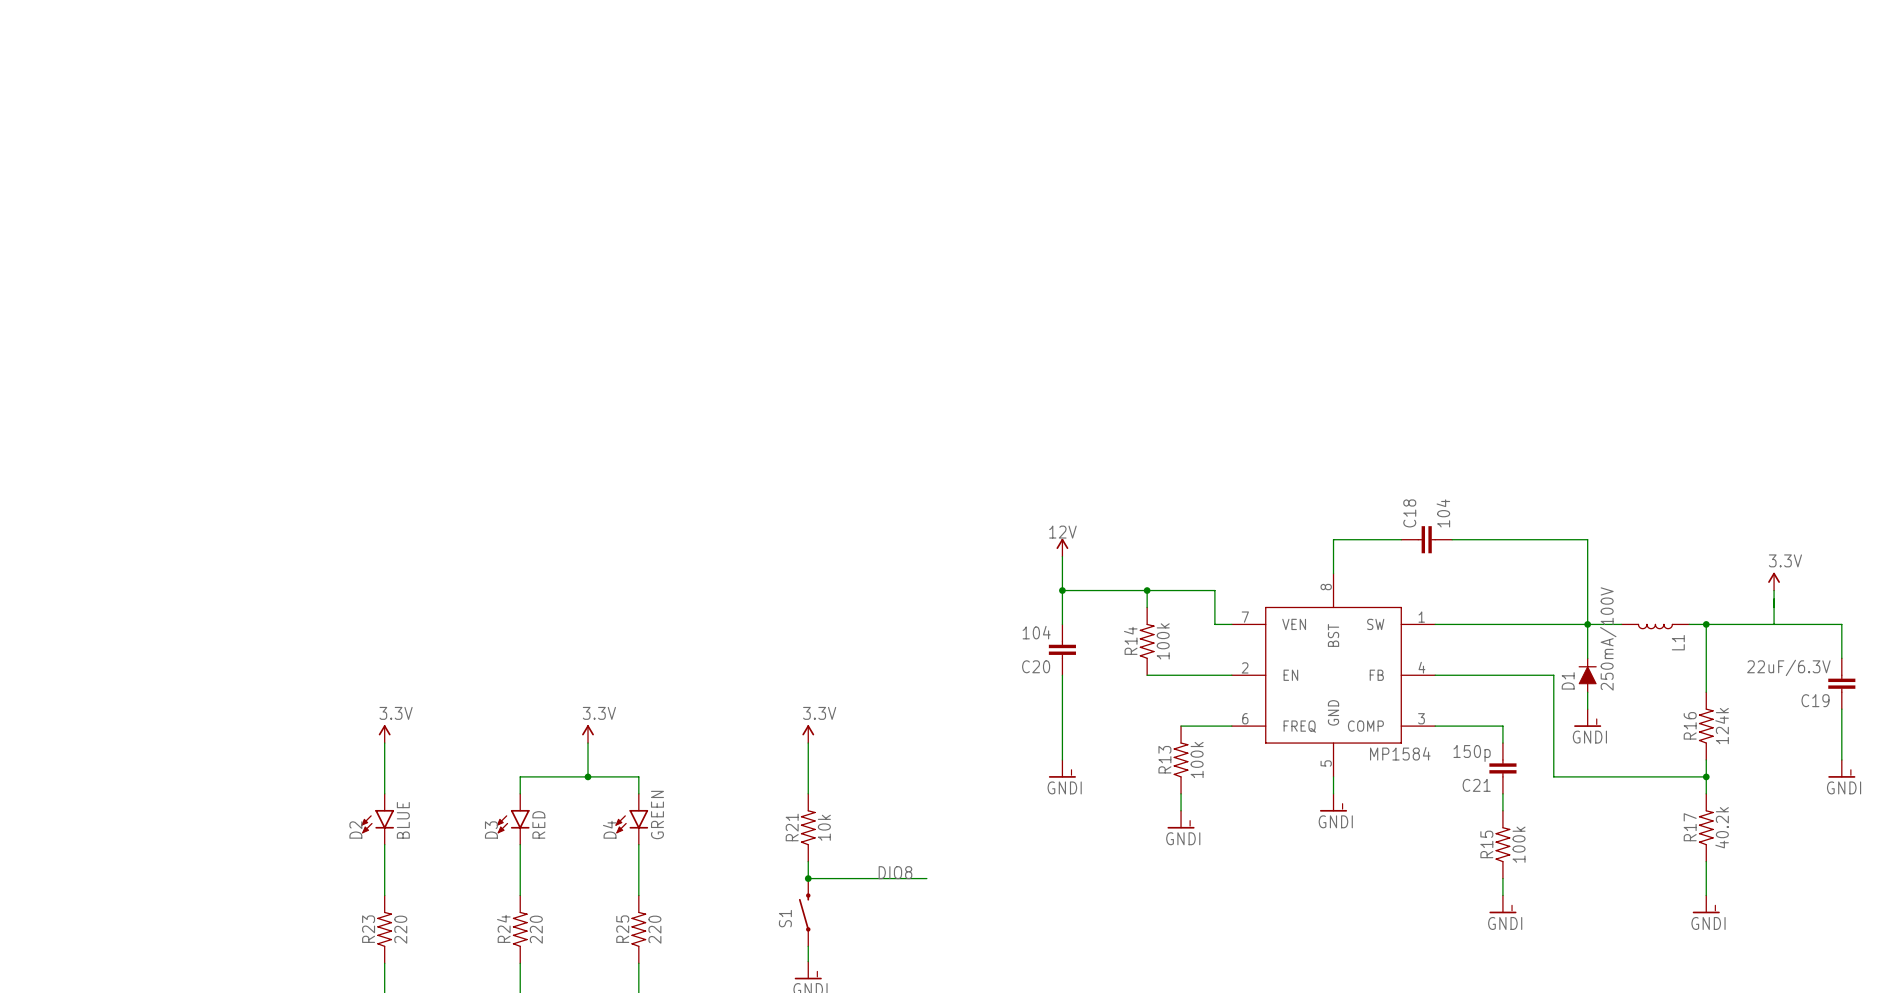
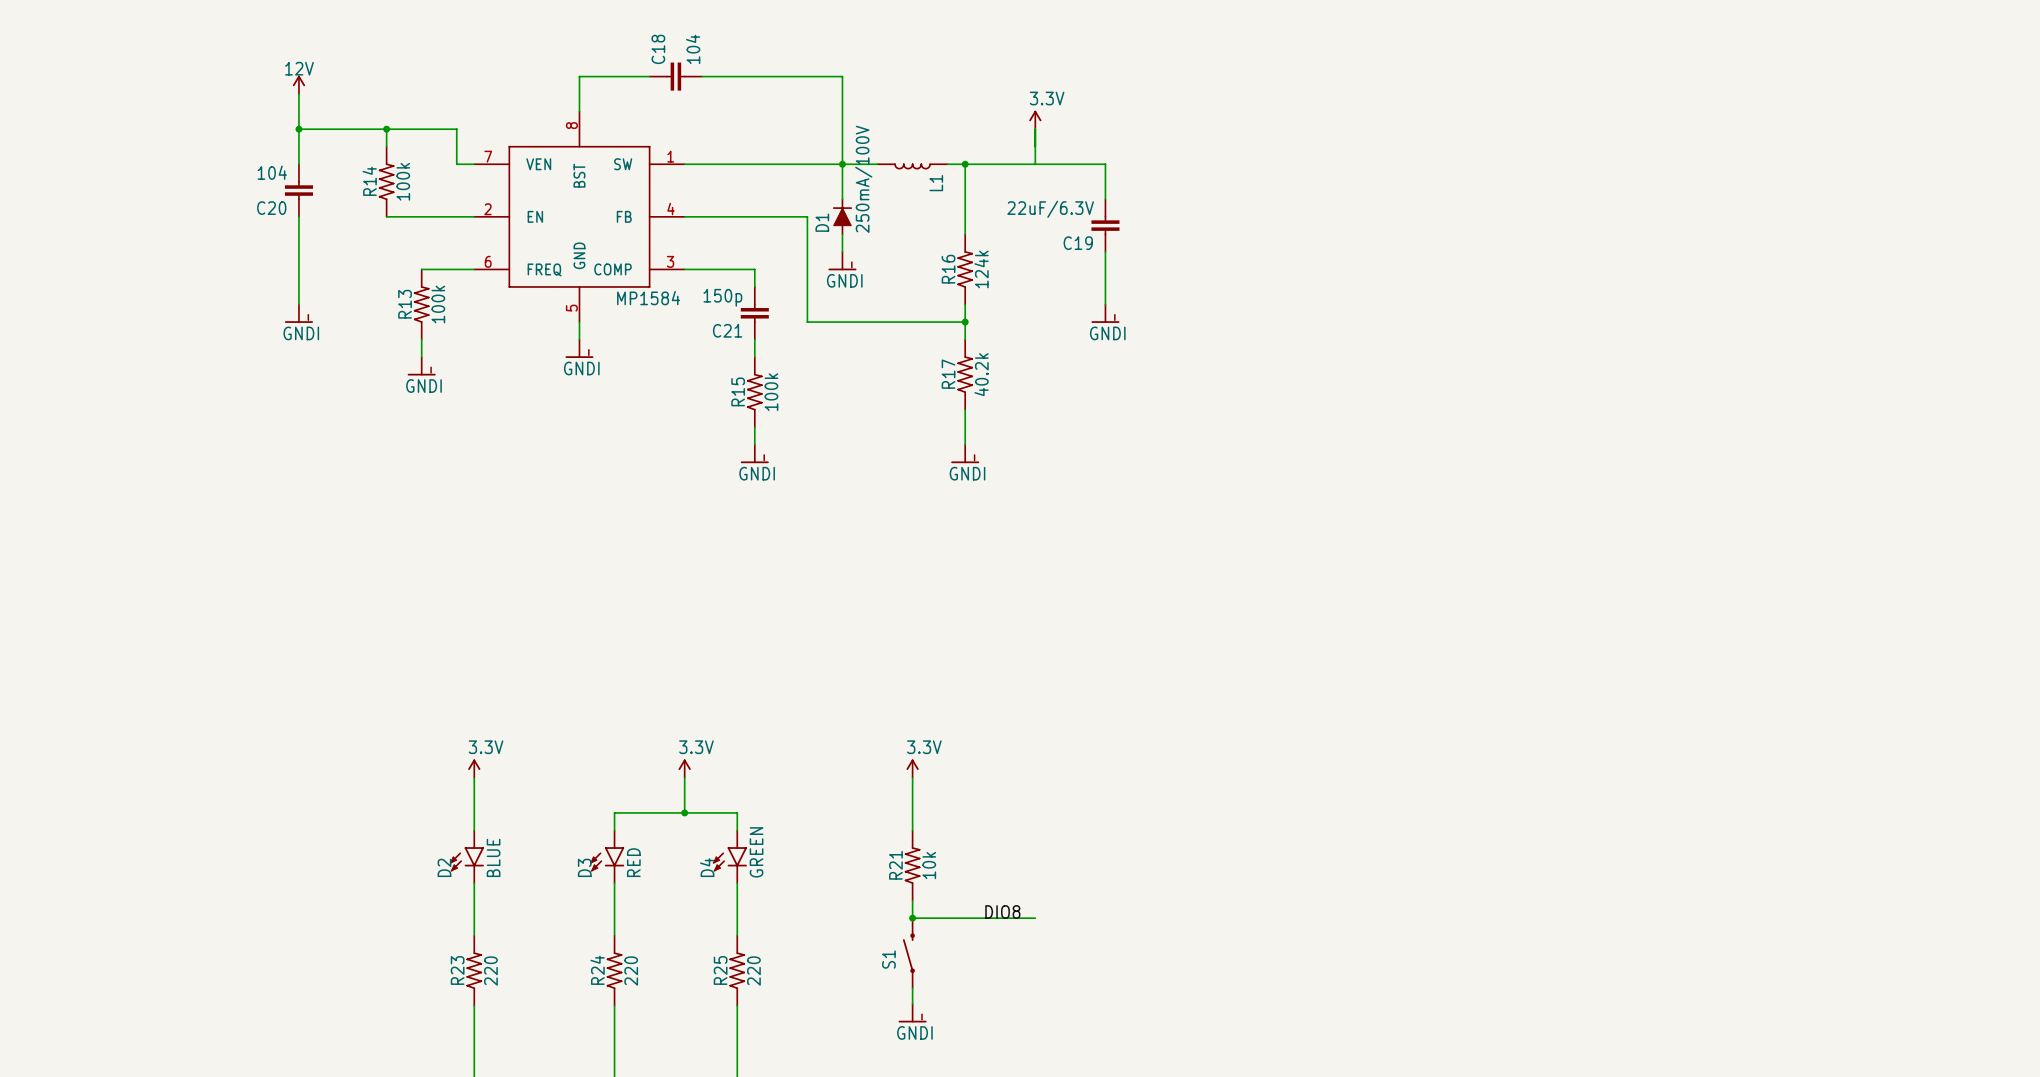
wire: none -> (649, 76) (579, 76) (579, 111)
wire: none -> (702, 76) (842, 76) (842, 199)
power symbol: none -> 12V (298, 84)
wire: none -> (298, 94) (298, 164)
power symbol: none -> 3.3V (1035, 119)
wire: none -> (298, 129) (456, 129) (456, 164) (474, 164)
junction: none -> (298, 129)
wire: none -> (386, 129) (386, 146)
junction: none -> (386, 129)
wire: none -> (1035, 129) (1035, 164)
wire: none -> (684, 164) (877, 164)
junction: none -> (842, 164)
wire: none -> (947, 164) (1105, 164) (1105, 199)
wire: none -> (965, 164) (965, 234)
junction: none -> (965, 164)
wire: none -> (298, 216) (298, 304)
wire: none -> (386, 216) (474, 216)
part: none -> (579, 216)
wire: none -> (684, 216) (807, 216) (807, 322) (965, 322)
wire: none -> (842, 234) (842, 251)
wire: none -> (1105, 251) (1105, 304)
power symbol: none -> GNDI (842, 261)
wire: none -> (421, 269) (474, 269)
wire: none -> (684, 269) (754, 269) (754, 286)
wire: none -> (965, 304) (965, 339)
power symbol: none -> GNDI (298, 313)
power symbol: none -> GNDI (1105, 313)
wire: none -> (579, 322) (579, 339)
junction: none -> (965, 322)
wire: none -> (421, 339) (421, 357)
wire: none -> (754, 339) (754, 357)
power symbol: none -> GNDI (579, 348)
power symbol: none -> GNDI (421, 366)
wire: none -> (965, 409) (965, 444)
wire: none -> (754, 427) (754, 444)
power symbol: none -> GNDI (754, 453)
power symbol: none -> GNDI (965, 453)
wire: (1401, 539) (1333, 539) (1333, 573) -> none
C18 position: (1426, 539) -> (675, 76)
wire: (1452, 539) (1587, 539) (1587, 658) -> none
power symbol: 12V (1062, 547) -> none
wire: (1062, 556) (1062, 624) -> none
power symbol: 3.3V (1774, 581) -> none
wire: (1062, 590) (1214, 590) (1214, 624) (1231, 624) -> none
junction: (1062, 590) -> none
wire: (1147, 590) (1147, 607) -> none
junction: (1147, 590) -> none
wire: (1774, 590) (1774, 624) -> none
wire: (1435, 624) (1621, 624) -> none
junction: (1587, 624) -> none
wire: (1689, 624) (1841, 624) (1841, 658) -> none
wire: (1706, 624) (1706, 692) -> none
junction: (1706, 624) -> none
L1 position: (1655, 626) -> (912, 166)
R14 position: (1147, 641) -> (386, 181)
C20 position: (1062, 649) -> (298, 190)
wire: (1062, 675) (1062, 759) -> none
wire: (1147, 675) (1231, 675) -> none
part: (1333, 675) -> none
wire: (1435, 675) (1553, 675) (1553, 776) (1706, 776) -> none
D1 position: (1587, 675) -> (842, 216)
C19 position: (1841, 683) -> (1105, 225)
wire: (1587, 692) (1587, 709) -> none
wire: (1841, 709) (1841, 759) -> none
power symbol: GNDI (1587, 718) -> none
wire: (1181, 726) (1231, 726) -> none
wire: (1435, 726) (1502, 726) (1502, 743) -> none
R16 position: (1706, 726) -> (965, 269)
R13 position: (1181, 759) -> (421, 304)
wire: (1706, 759) (1706, 793) -> none
power symbol: GNDI (1062, 768) -> none
C21 position: (1502, 768) -> (754, 313)
power symbol: GNDI (1841, 768) -> none
wire: (1333, 776) (1333, 793) -> none
junction: (1706, 776) -> none
wire: (1181, 793) (1181, 810) -> none
wire: (1502, 793) (1502, 810) -> none
power symbol: GNDI (1333, 802) -> none
power symbol: GNDI (1181, 819) -> none
R17 position: (1706, 827) -> (965, 374)
R15 position: (1502, 844) -> (754, 392)
wire: (1706, 861) (1706, 895) -> none
wire: (1502, 878) (1502, 895) -> none
power symbol: GNDI (1502, 904) -> none
power symbol: GNDI (1706, 904) -> none

